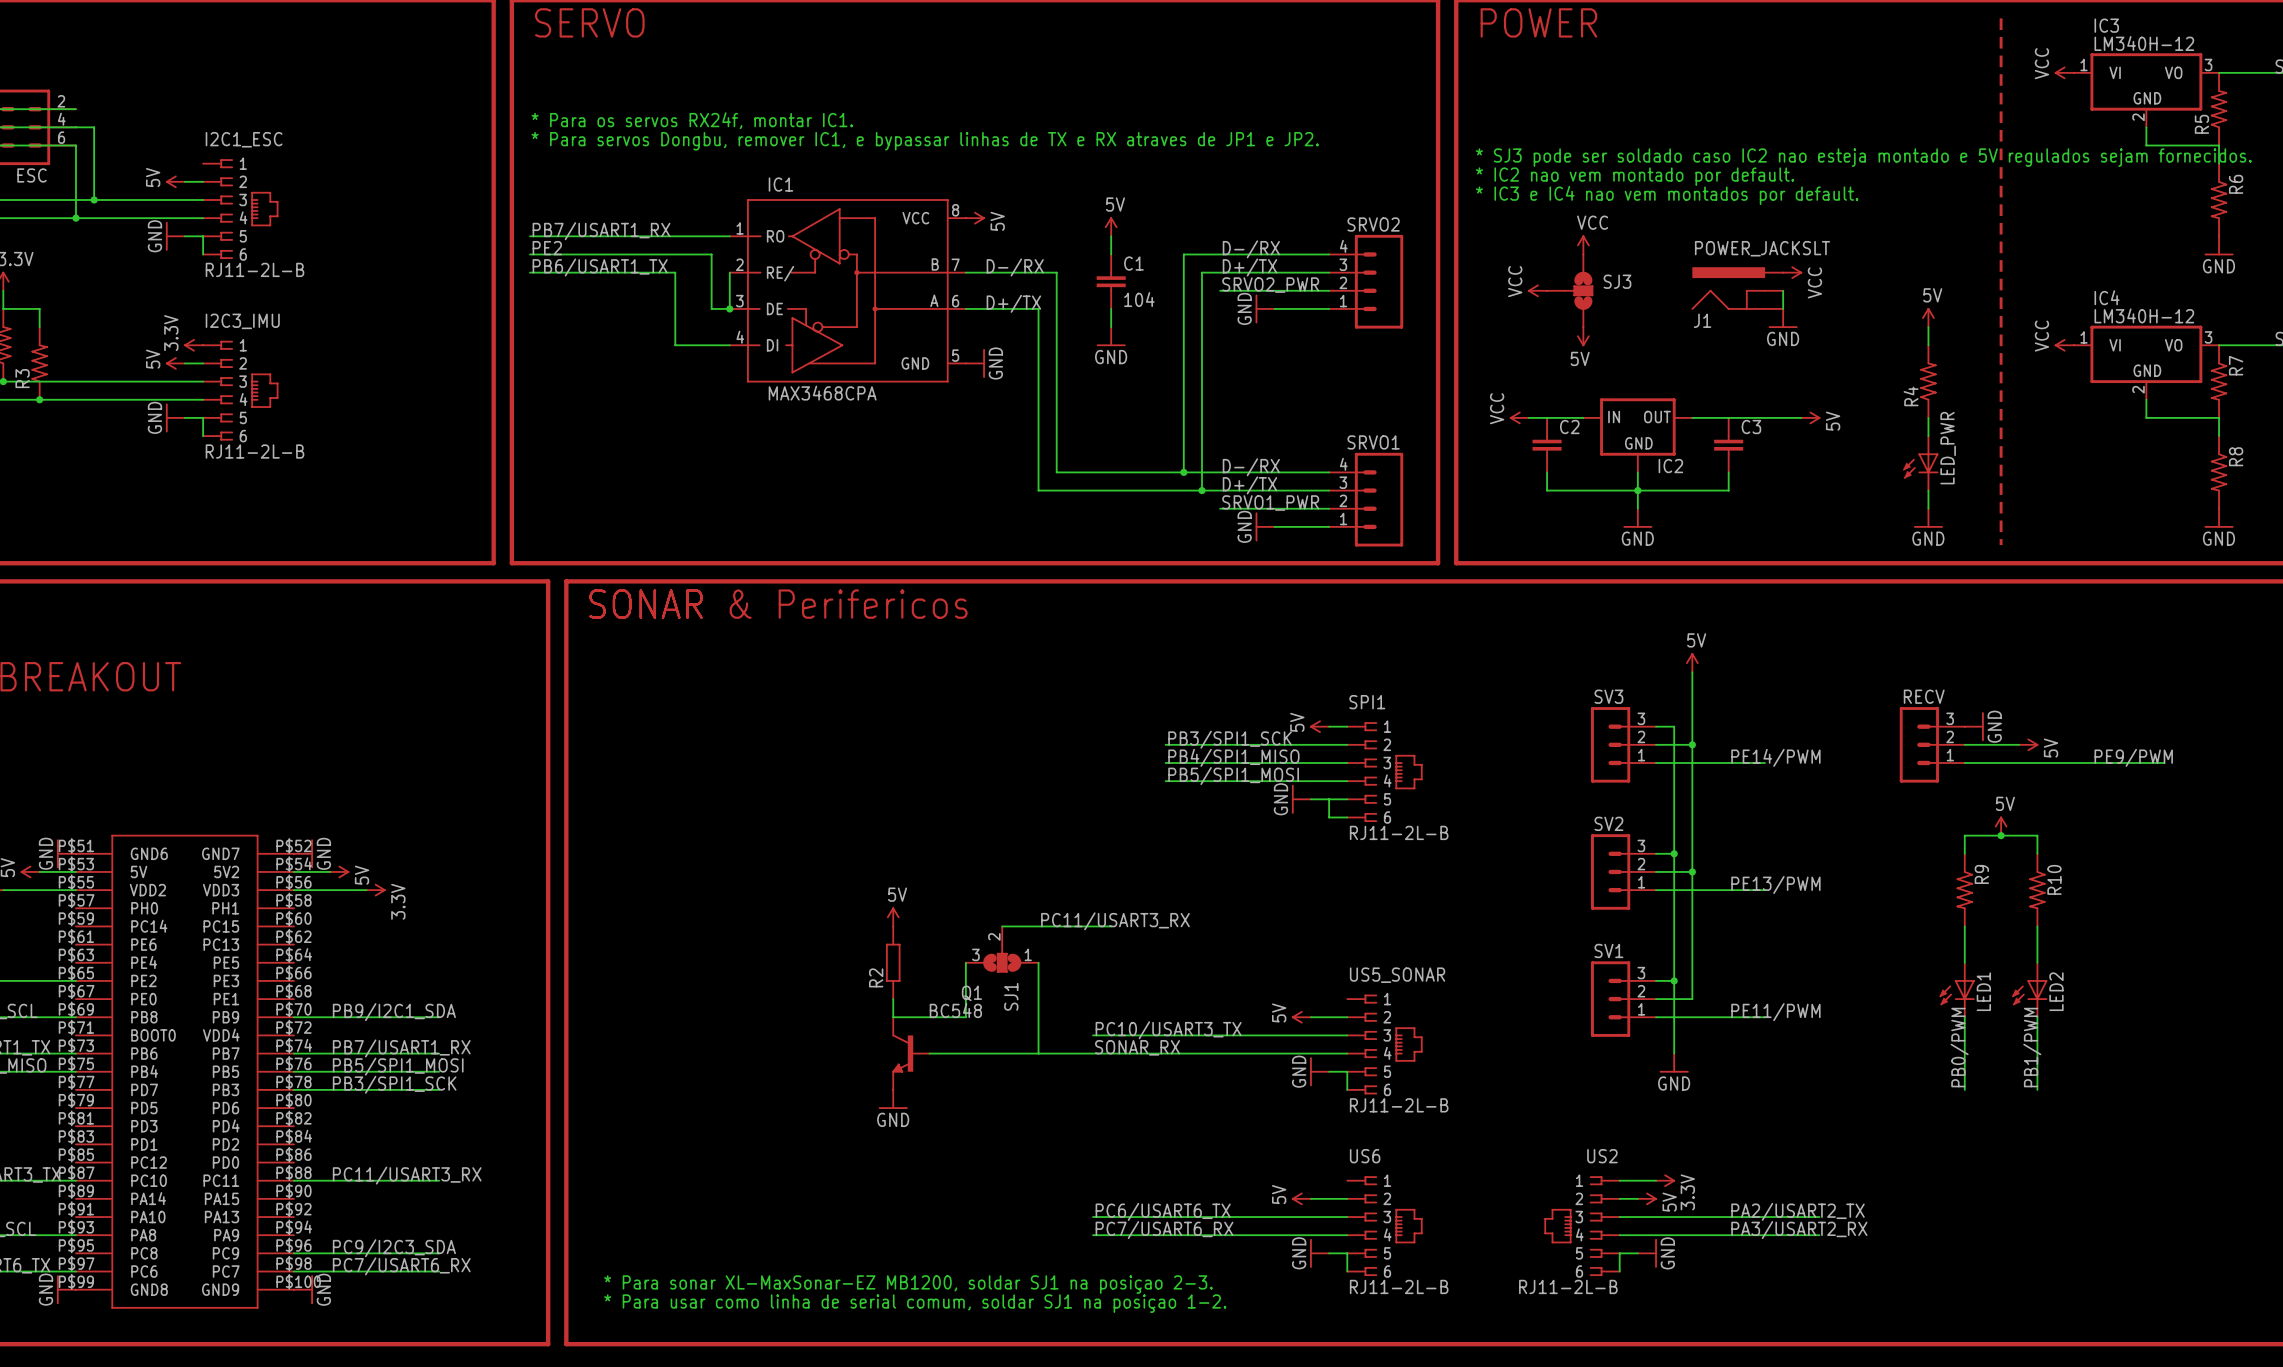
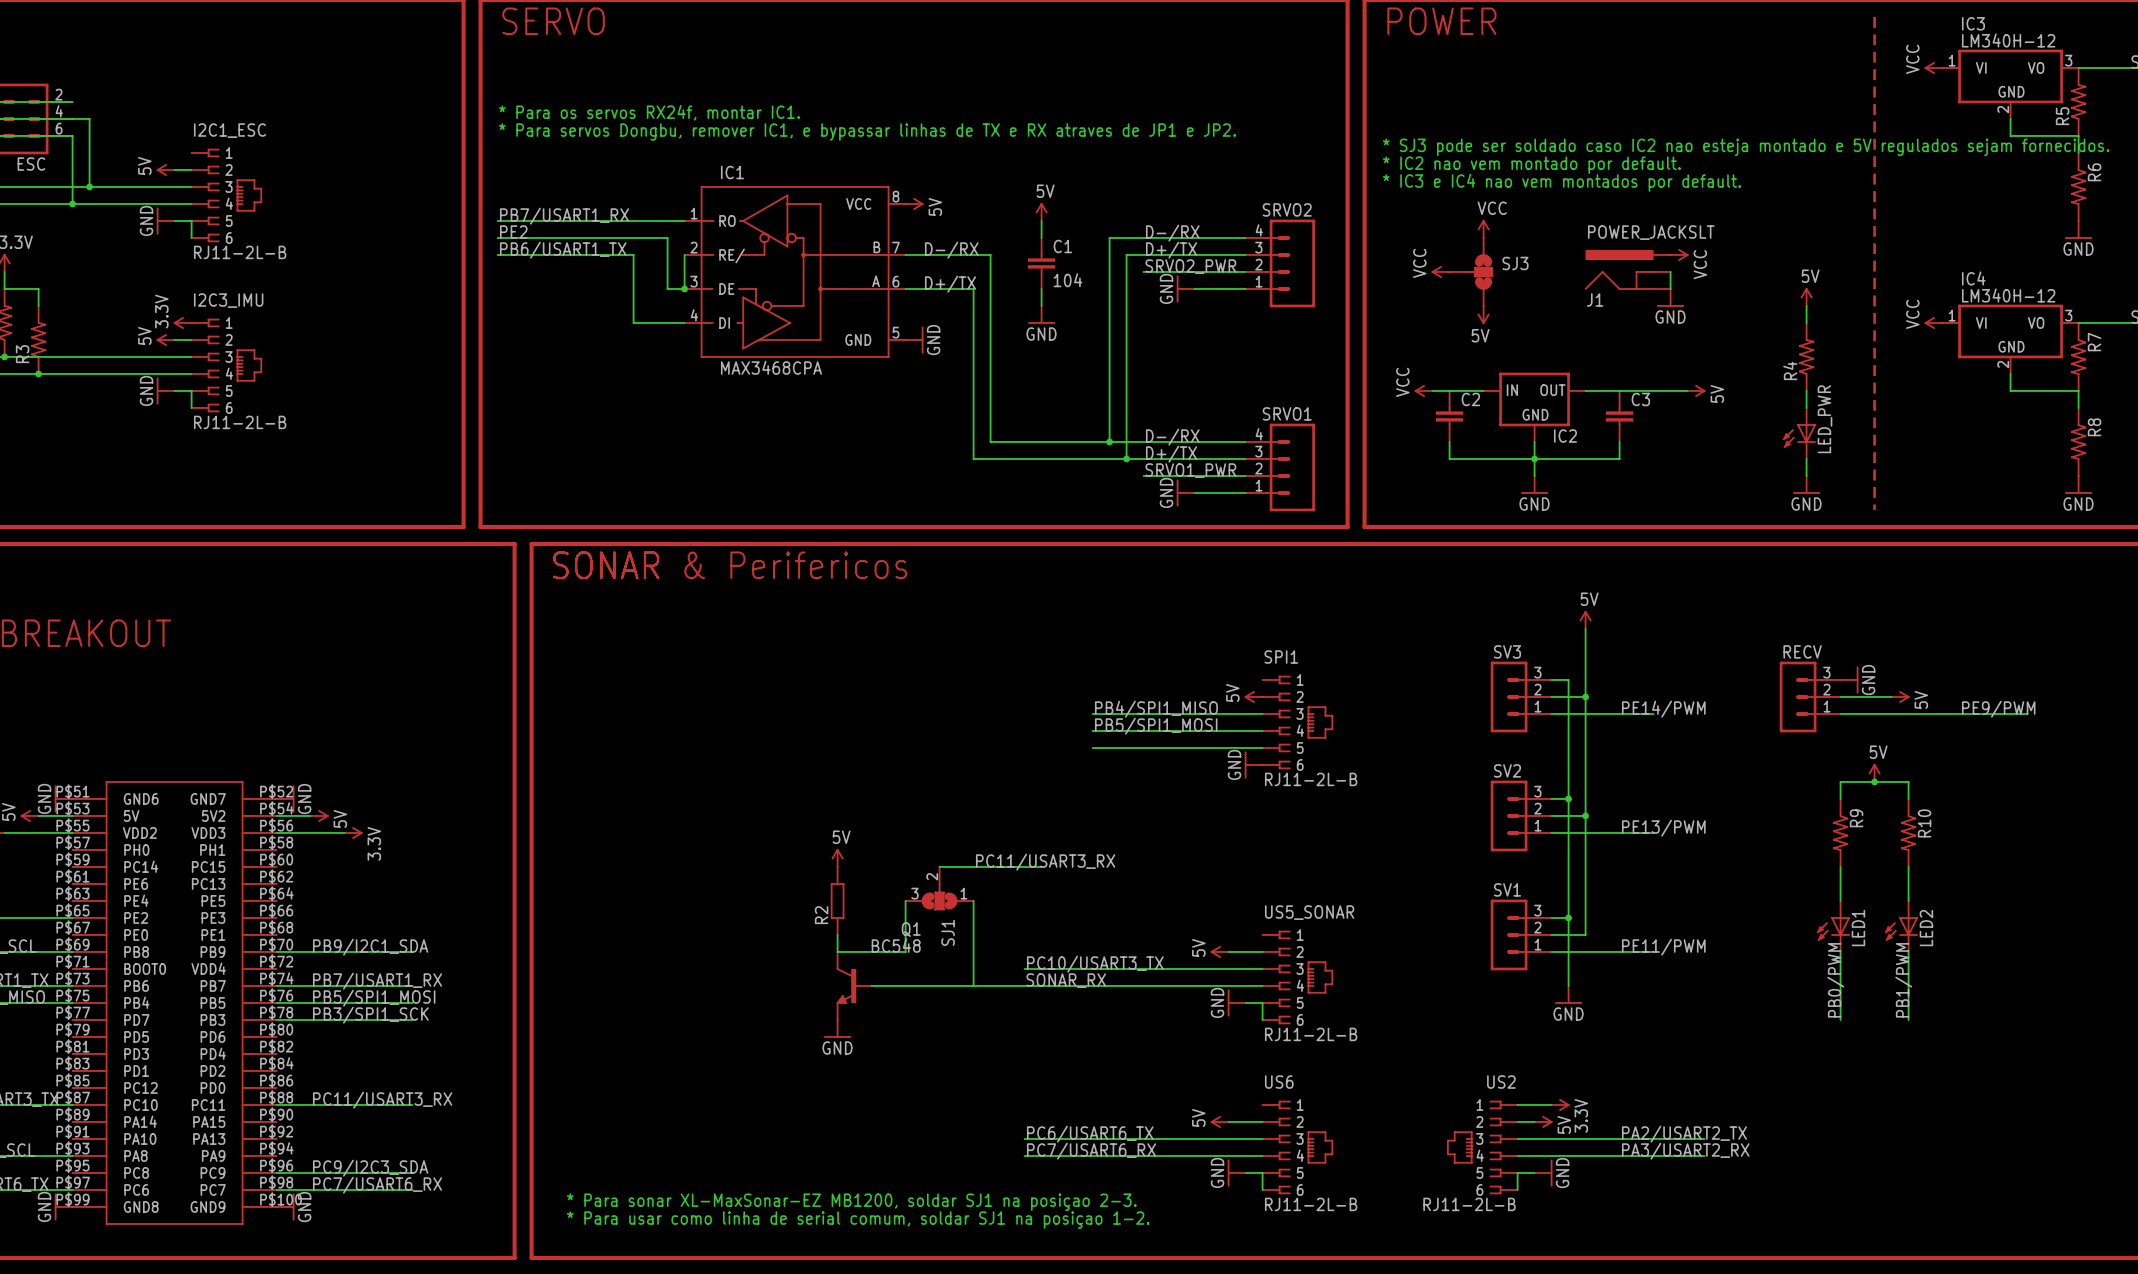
power symbol position: 5V (1319, 726) -> 5V (1253, 696)
wire: (1329, 726) (1347, 726) -> none
label: PB3/SPI1_SCK (1230, 739) -> none
wire: (1165, 744) (1347, 744) -> none
wire: none -> (1092, 747) (1228, 747)
power symbol position: GND (1301, 799) -> GND (1253, 764)

